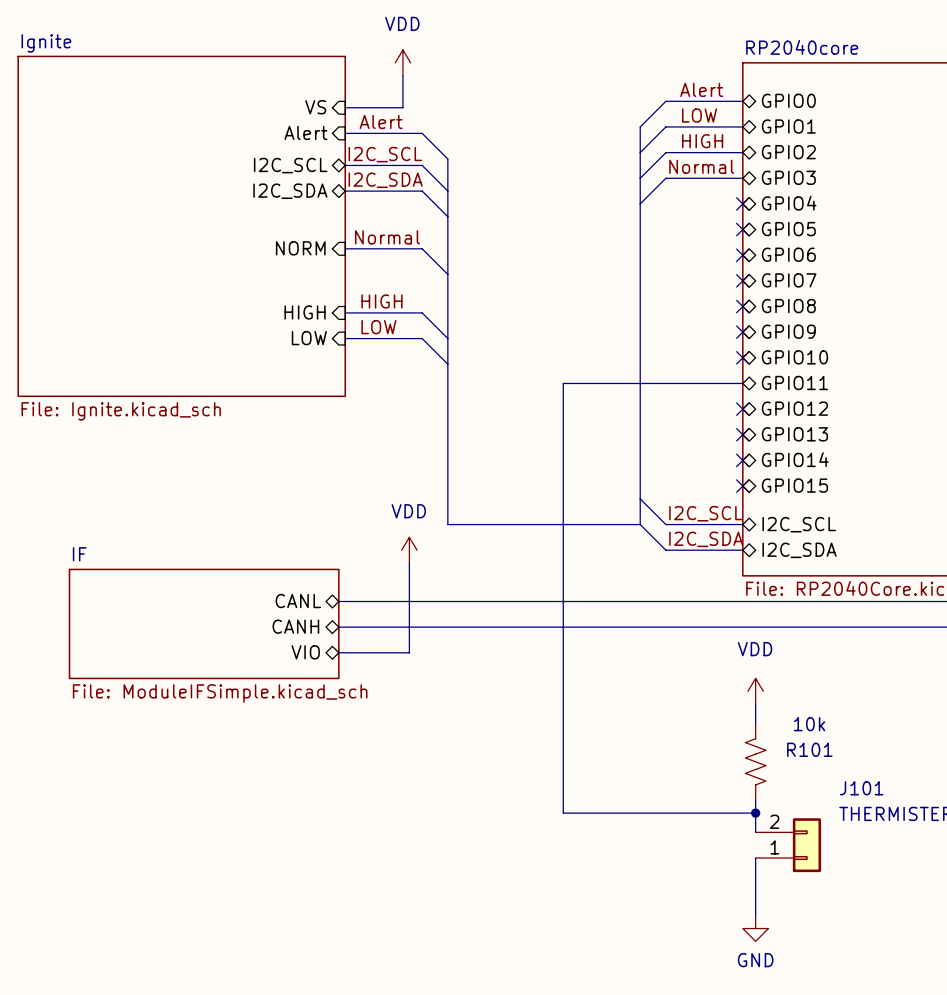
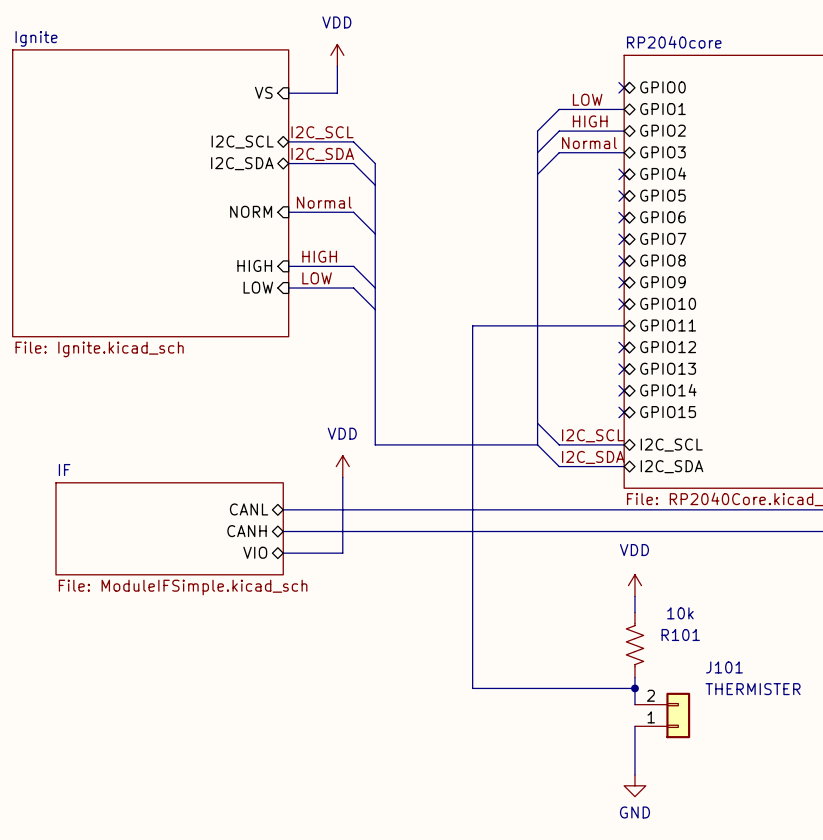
label: Alert (701, 89) -> none
wire: (742, 101) (665, 101) (640, 126) -> none
no-connect mark: none -> (624, 87)
label: Alert (381, 121) -> none
bus: (640, 126) (640, 152) -> none
sheet pin: Alert (305, 132) -> none
wire: (345, 133) (422, 133) (447, 159) -> none
bus: (447, 159) (447, 191) -> none

